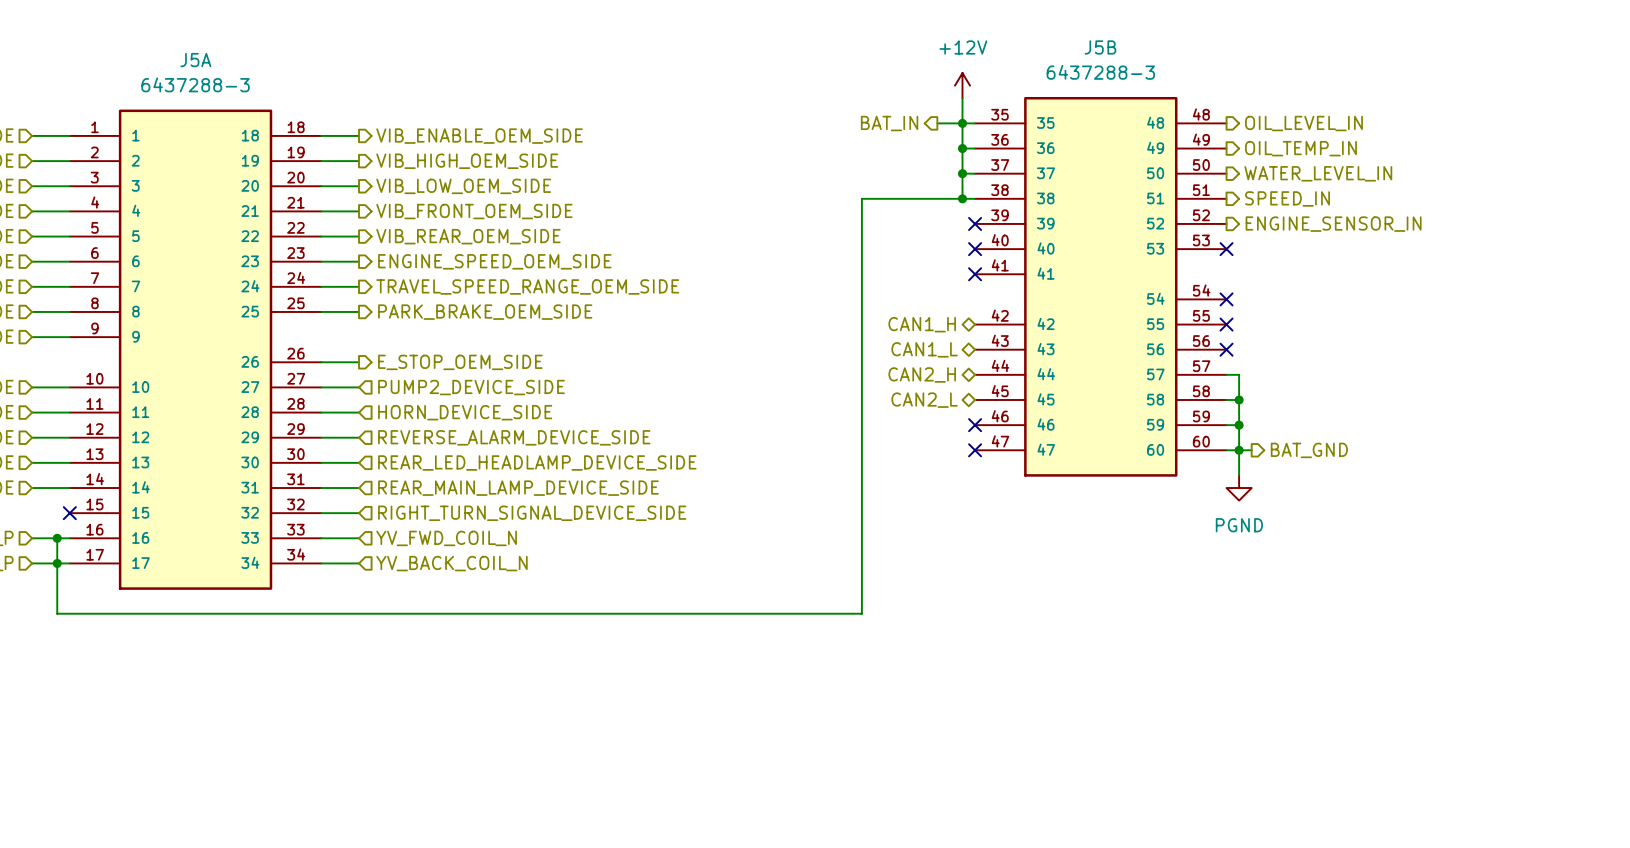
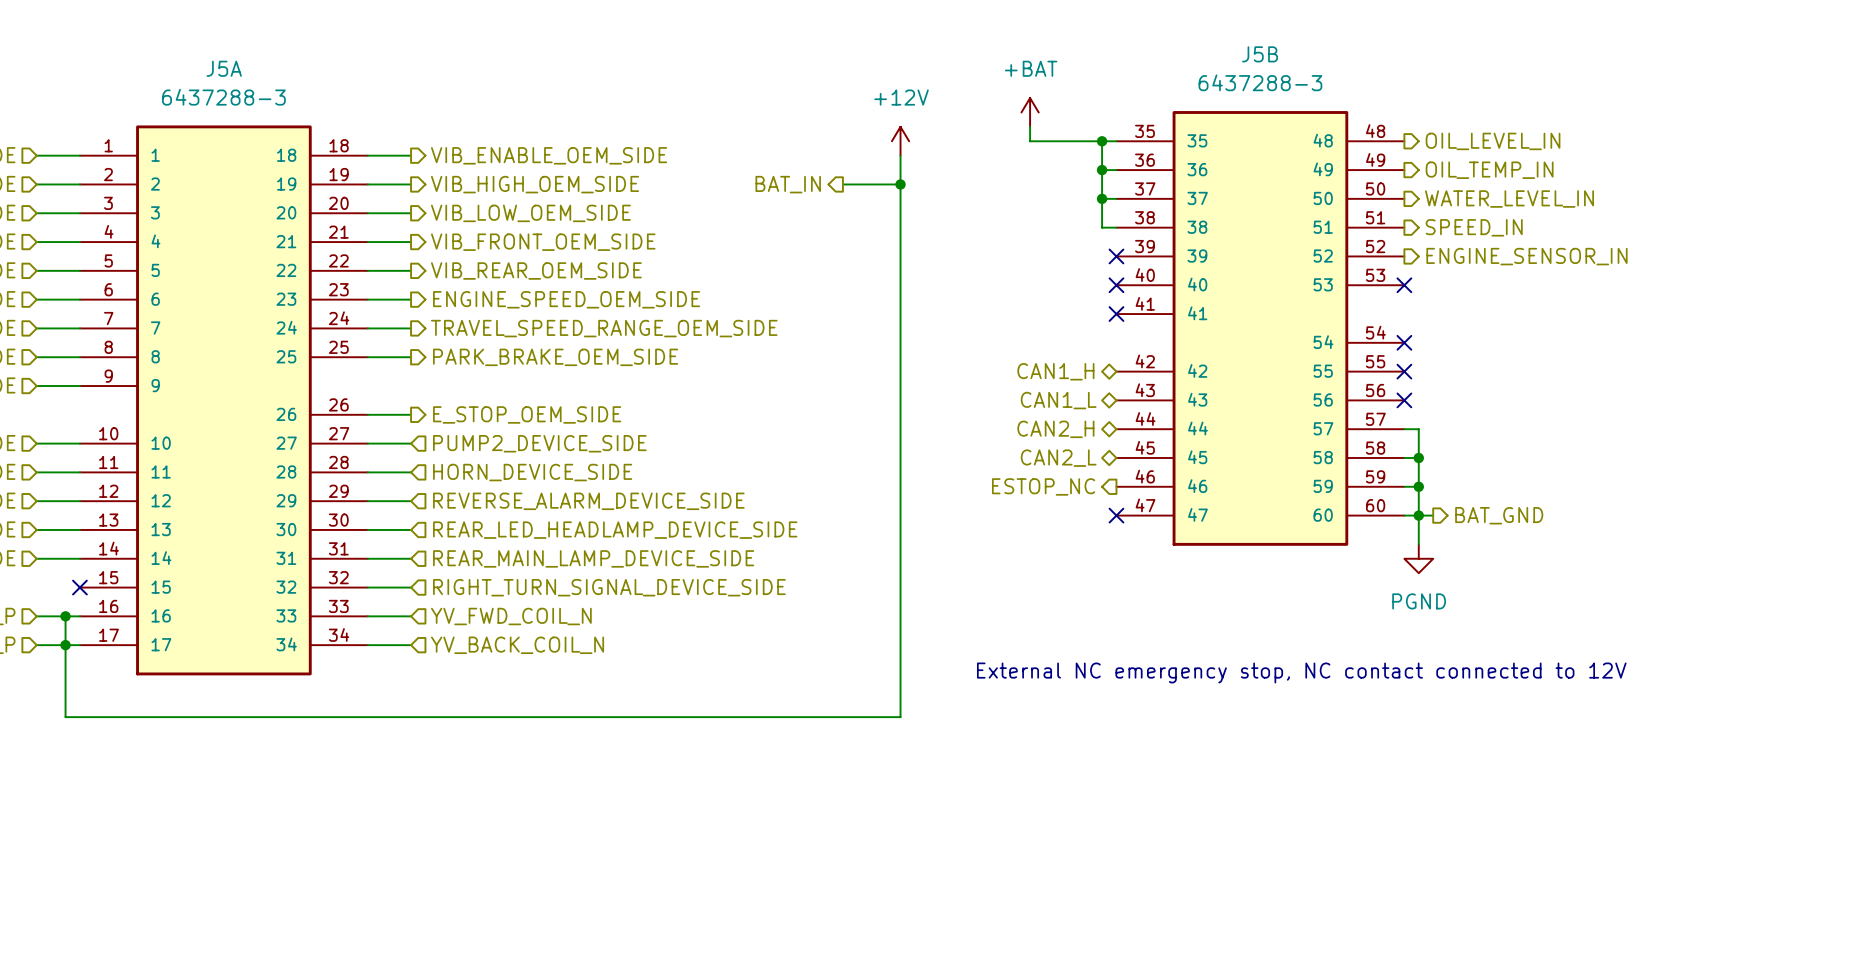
power symbol position: +12V (962, 85) -> +12V (900, 141)
power symbol: none -> +BAT (1030, 112)
wire: (962, 98) (962, 123) -> none
wire: none -> (1030, 126) (1030, 141) (1073, 141)
hierarchical label position: BAT_IN (889, 123) -> BAT_IN (788, 184)
wire: none -> (842, 184) (900, 184)
junction: none -> (900, 184)
wire: (962, 198) (861, 198) (861, 613) (57, 613) -> (900, 155) (900, 717) (65, 717) (65, 702)
junction: (962, 198) -> none
hierarchical label: none -> ESTOP_NC (1043, 486)
no-connect mark: (975, 425) -> none
text: none -> External NC emergency stop, NC contact connected to 12V (1301, 672)

